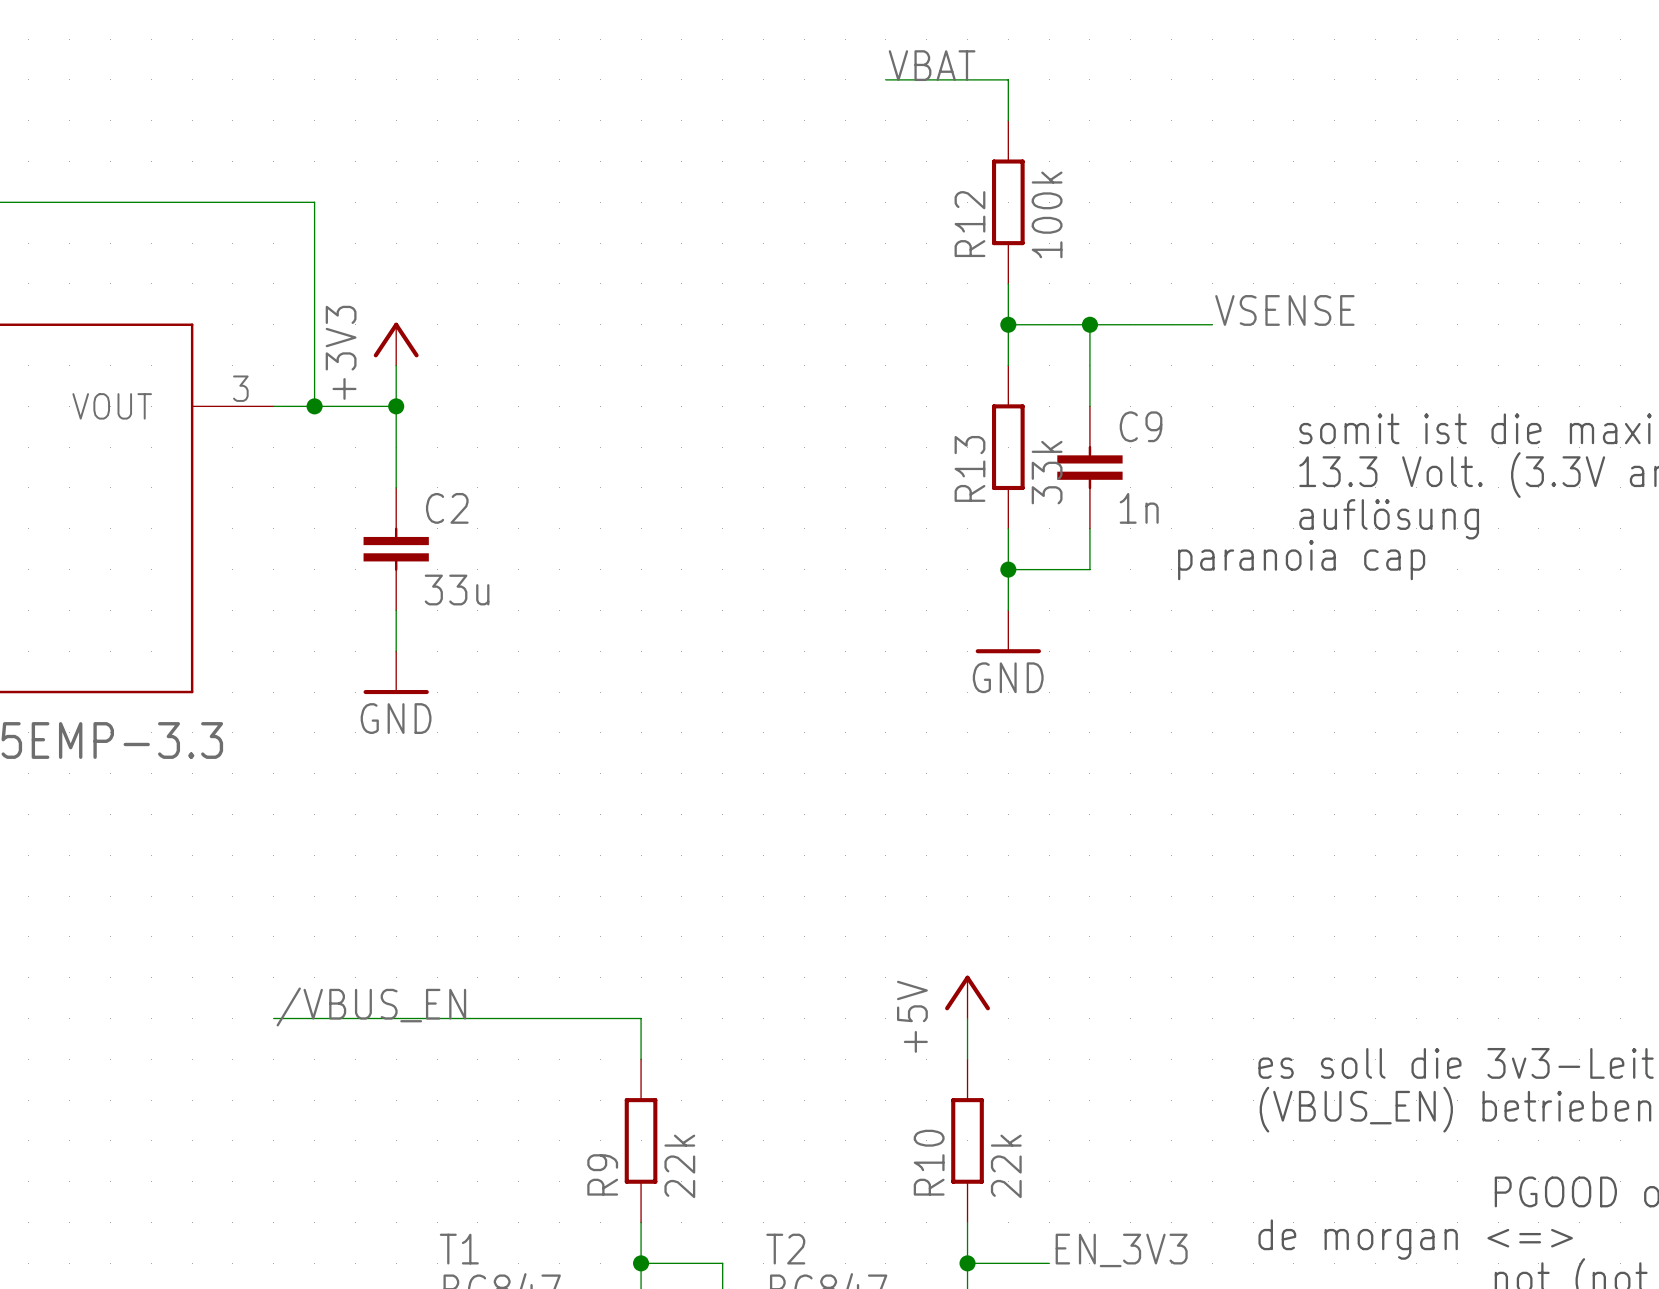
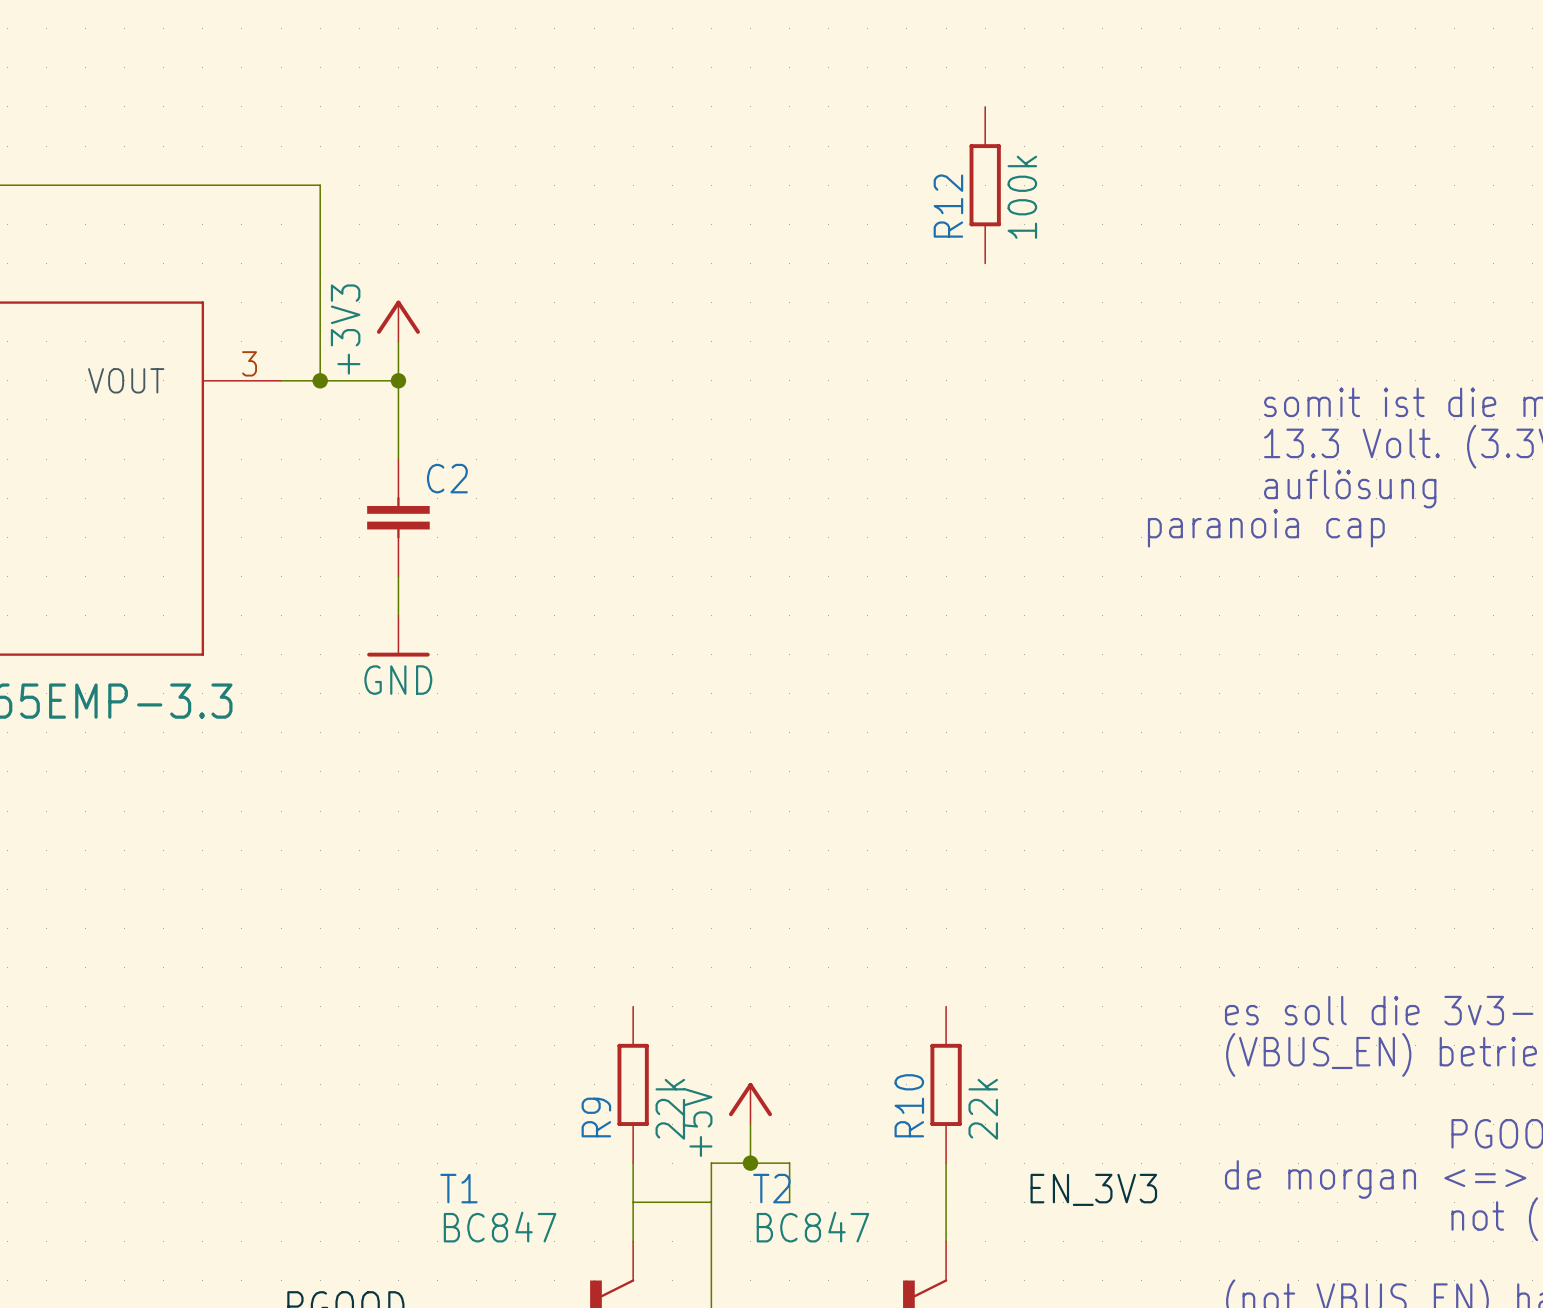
label: VBAT (932, 65) -> none
wire: (885, 79) (1008, 79) (1008, 120) -> none
wire: (1008, 283) (1008, 365) -> none
label: VSENSE (1284, 310) -> none
wire: (1008, 324) (1212, 324) -> none
junction: (1008, 324) -> none
wire: (1089, 324) (1089, 406) -> none
junction: (1089, 324) -> none
R13: 33k (1008, 447) -> none
C9: 1n (1089, 467) -> none
wire: (1008, 528) (1008, 610) -> none
wire: (1089, 528) (1089, 569) (1008, 569) -> none
junction: (1008, 569) -> none
C2 value: 33u (457, 590) -> none
power symbol: GND (1008, 631) -> none
power symbol position: +5V (967, 997) -> +5V (750, 1103)
label: /VBUS_EN (371, 1006) -> none
wire: (273, 1018) (641, 1018) (641, 1059) -> none
wire: (967, 1018) (967, 1059) -> (750, 1124) (750, 1163)
junction: none -> (750, 1163)
junction: (641, 1263) -> none
wire: none -> (711, 1202) (711, 1163) (789, 1163) (789, 1202)
wire: (967, 1263) (1049, 1263) -> none
junction: (967, 1263) -> none

